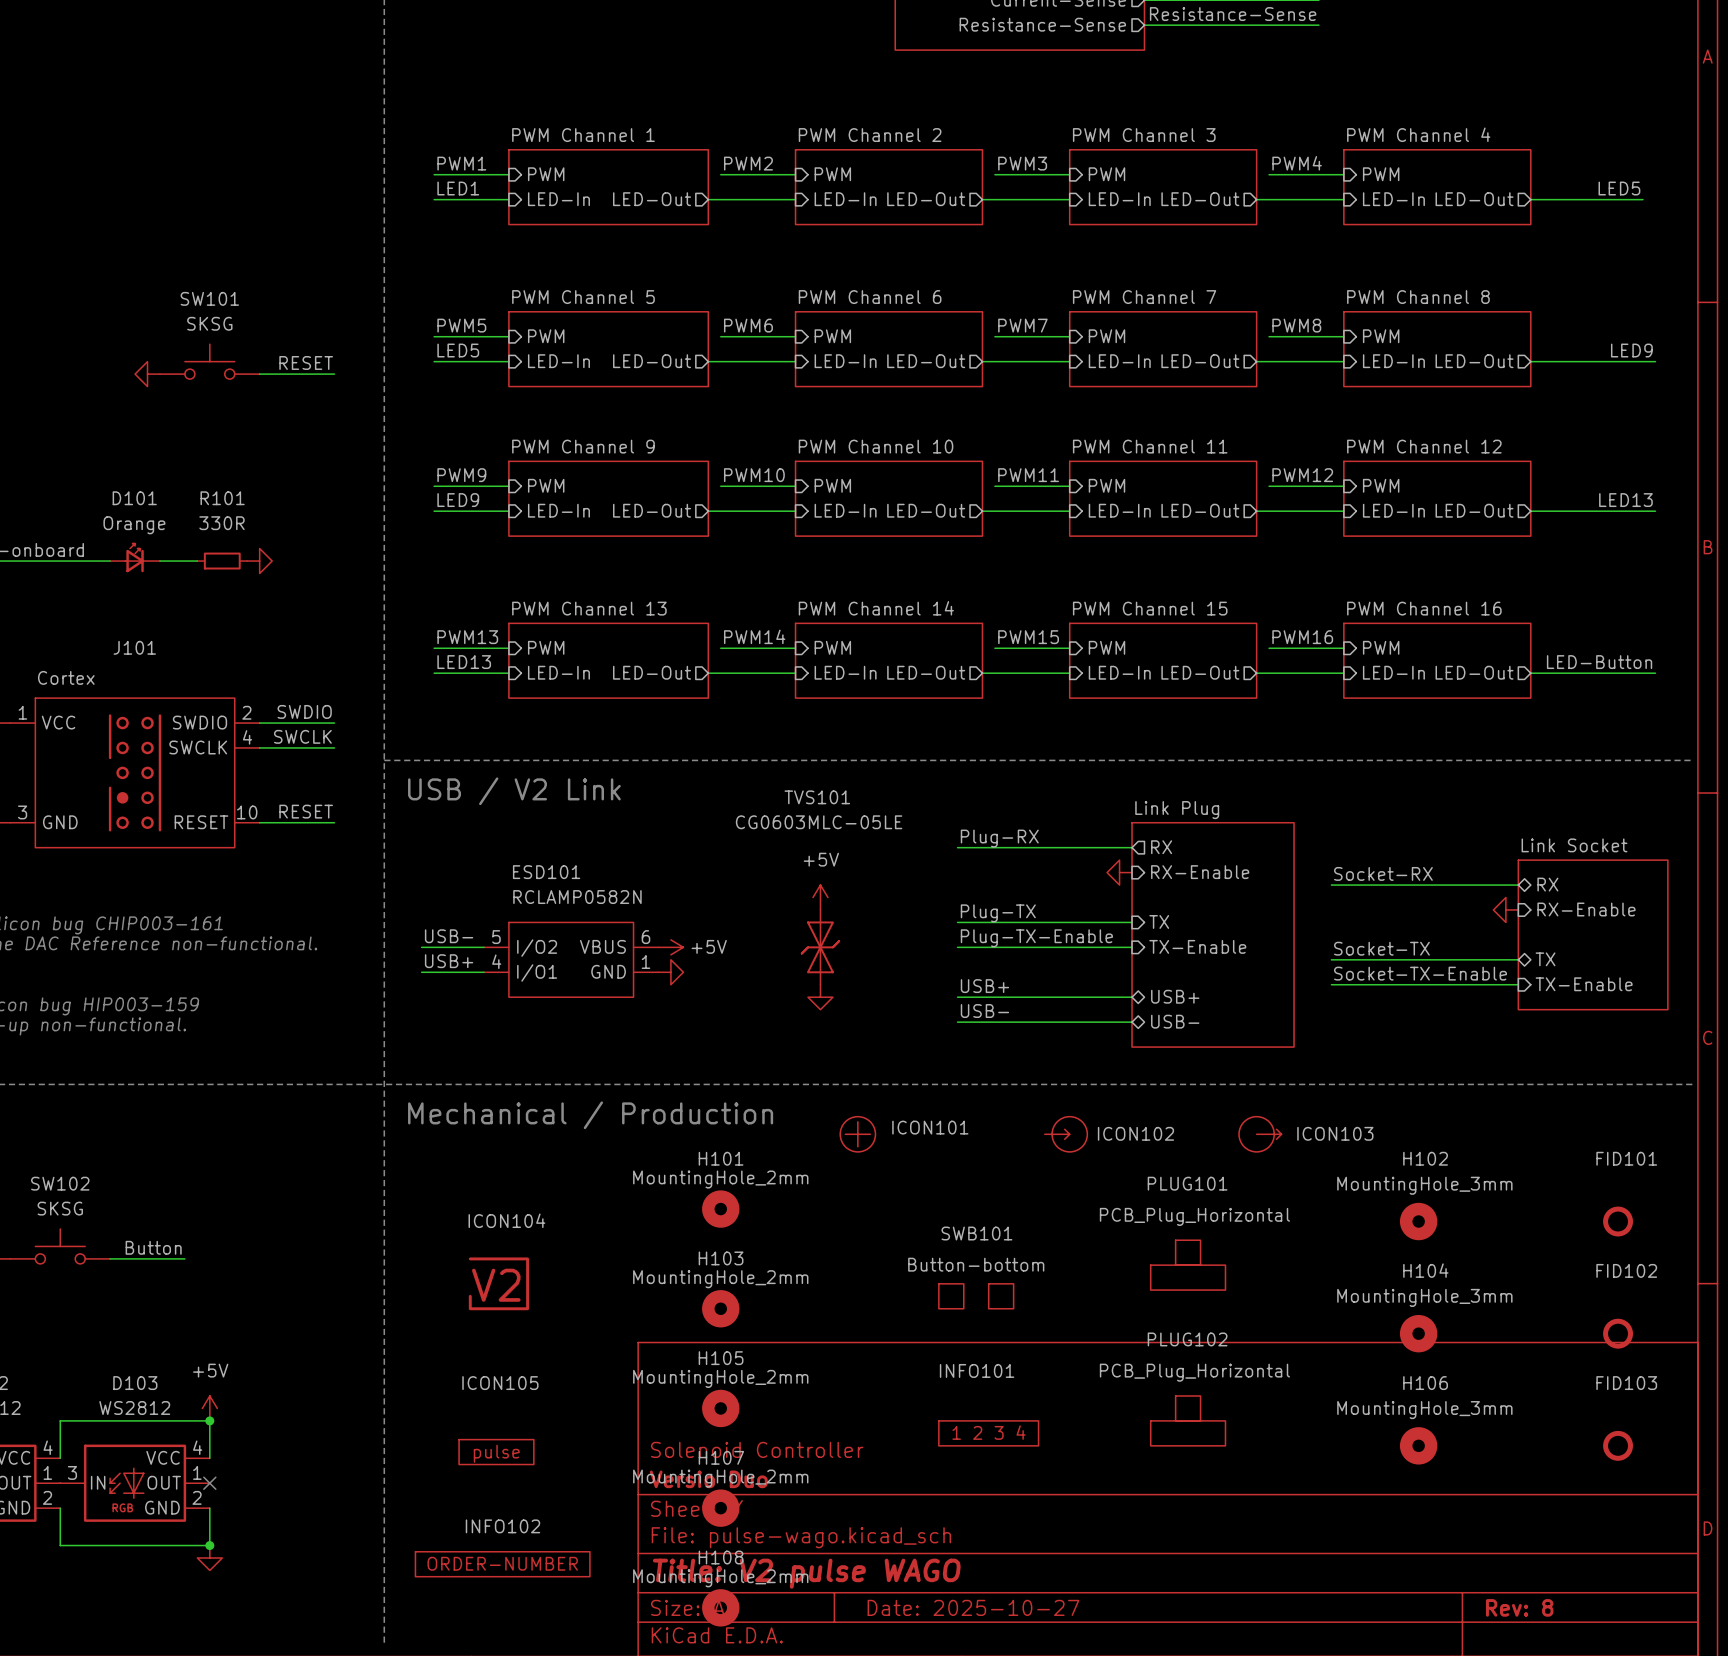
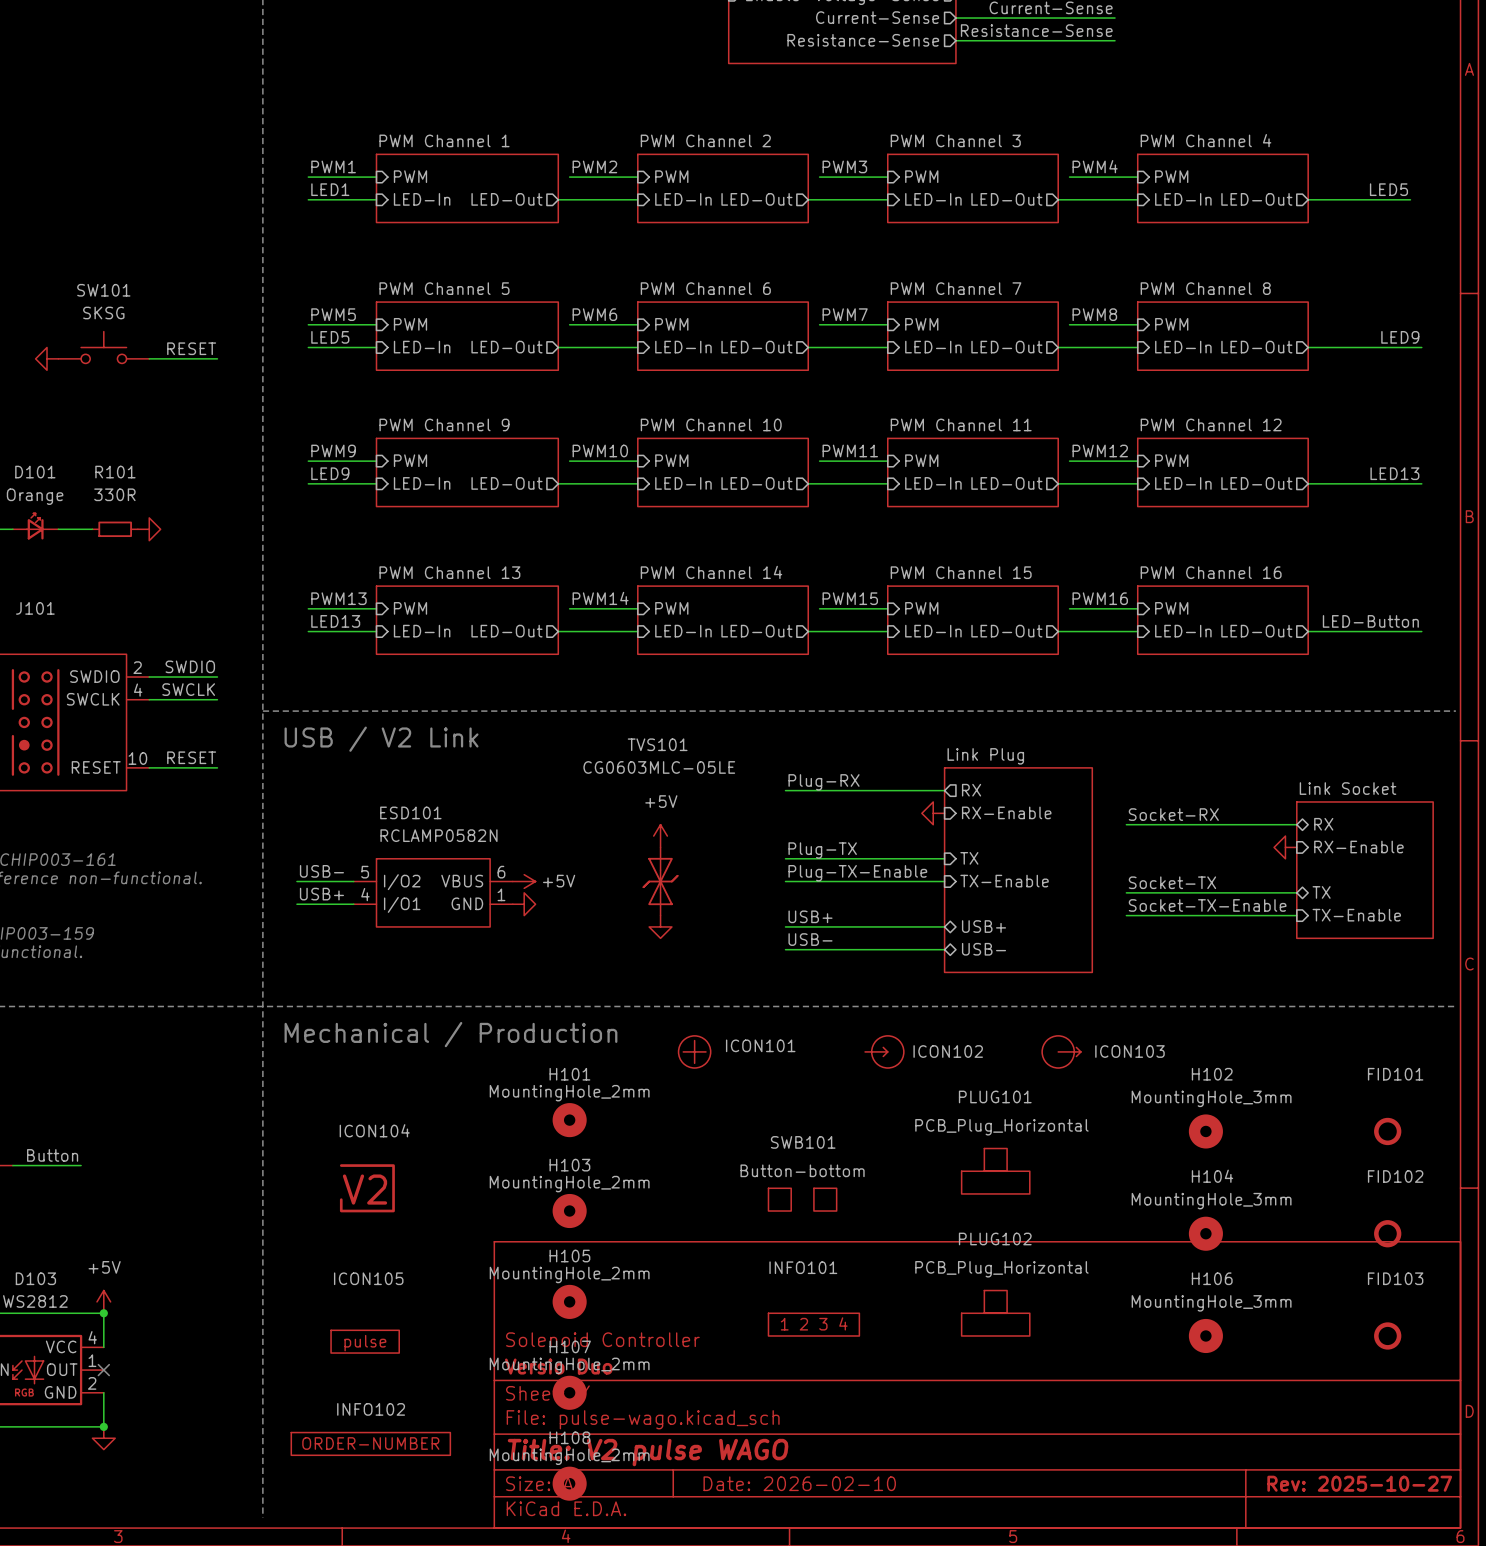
title block: Date: 2025-10-27 (973, 1607) -> Date: 2026-02-10 (799, 1483)
title block: Rev: 8 (1519, 1607) -> Rev: 2025-10-27 (1359, 1483)

